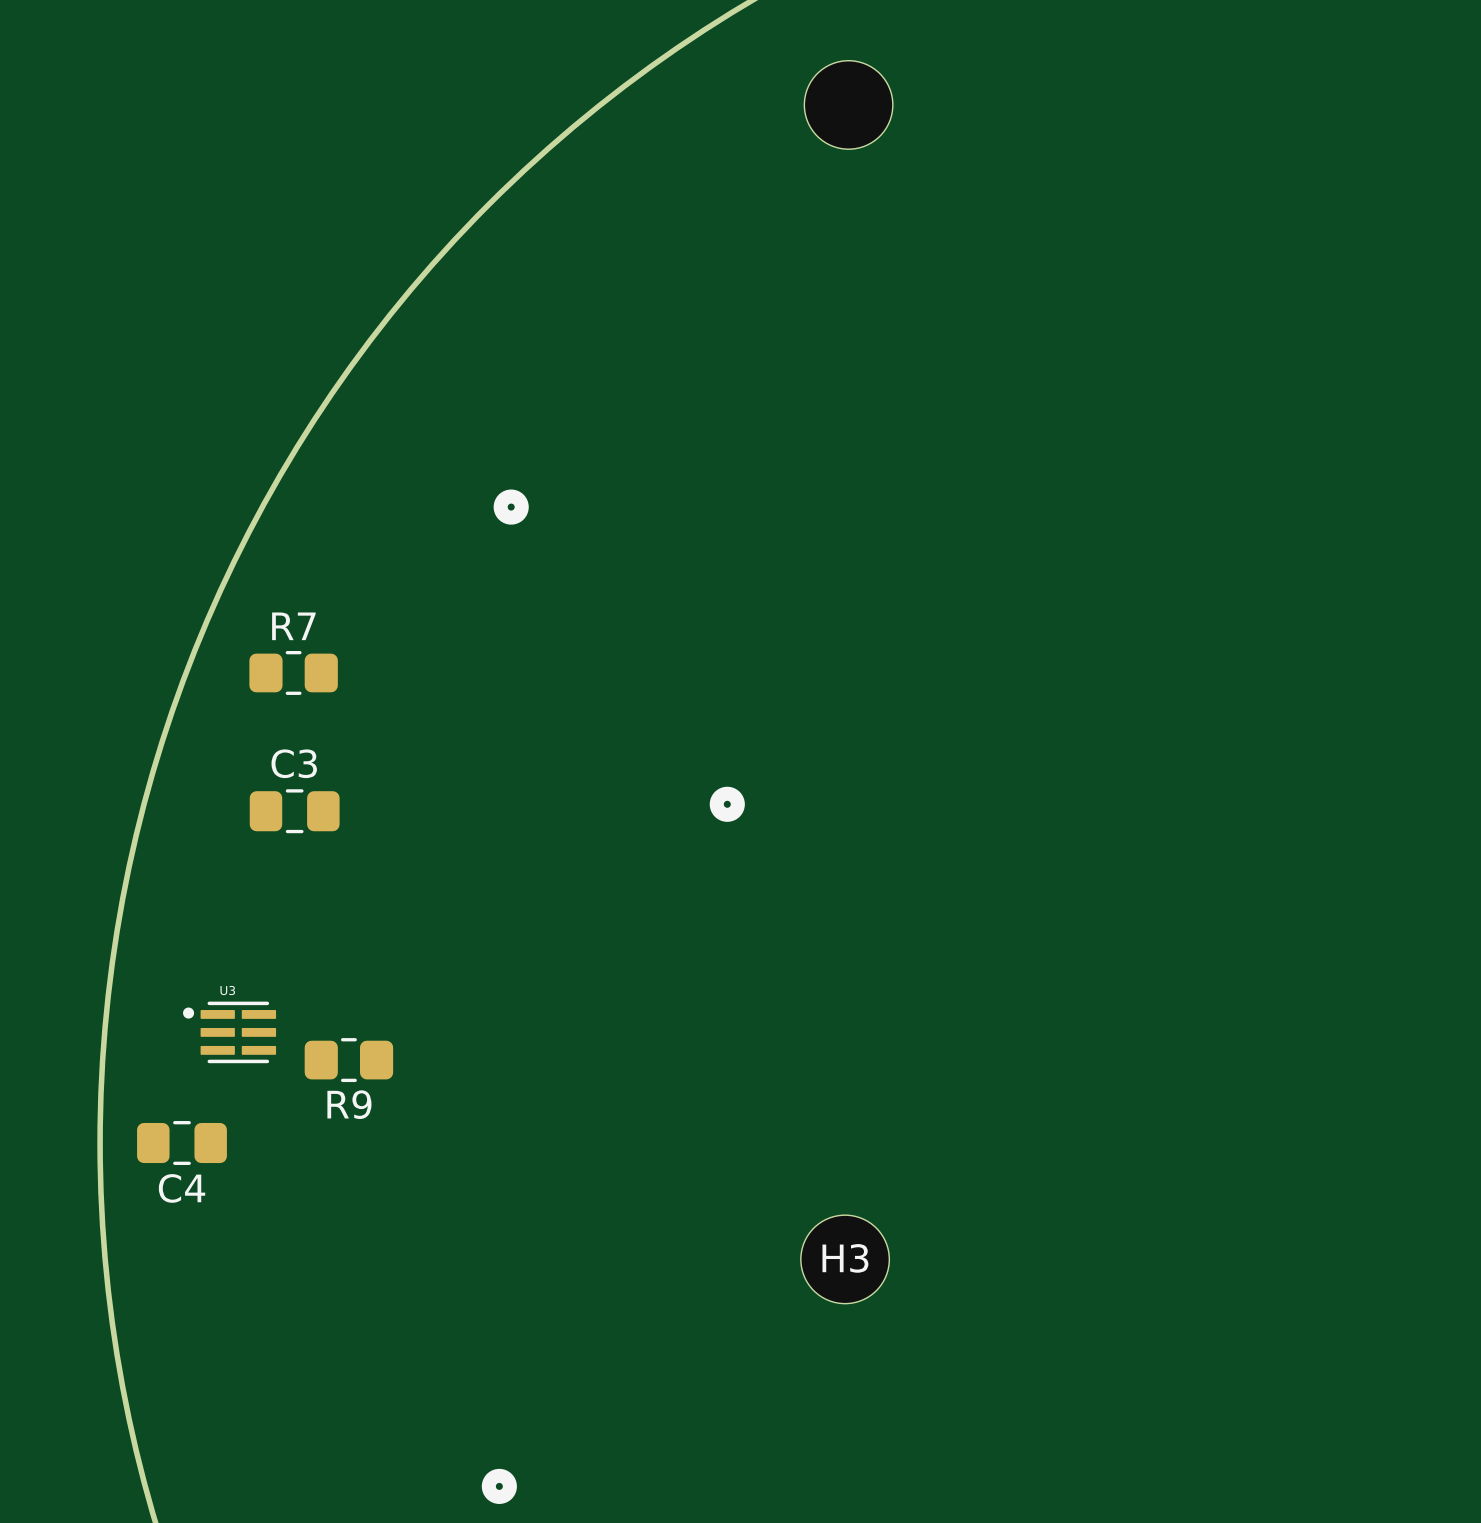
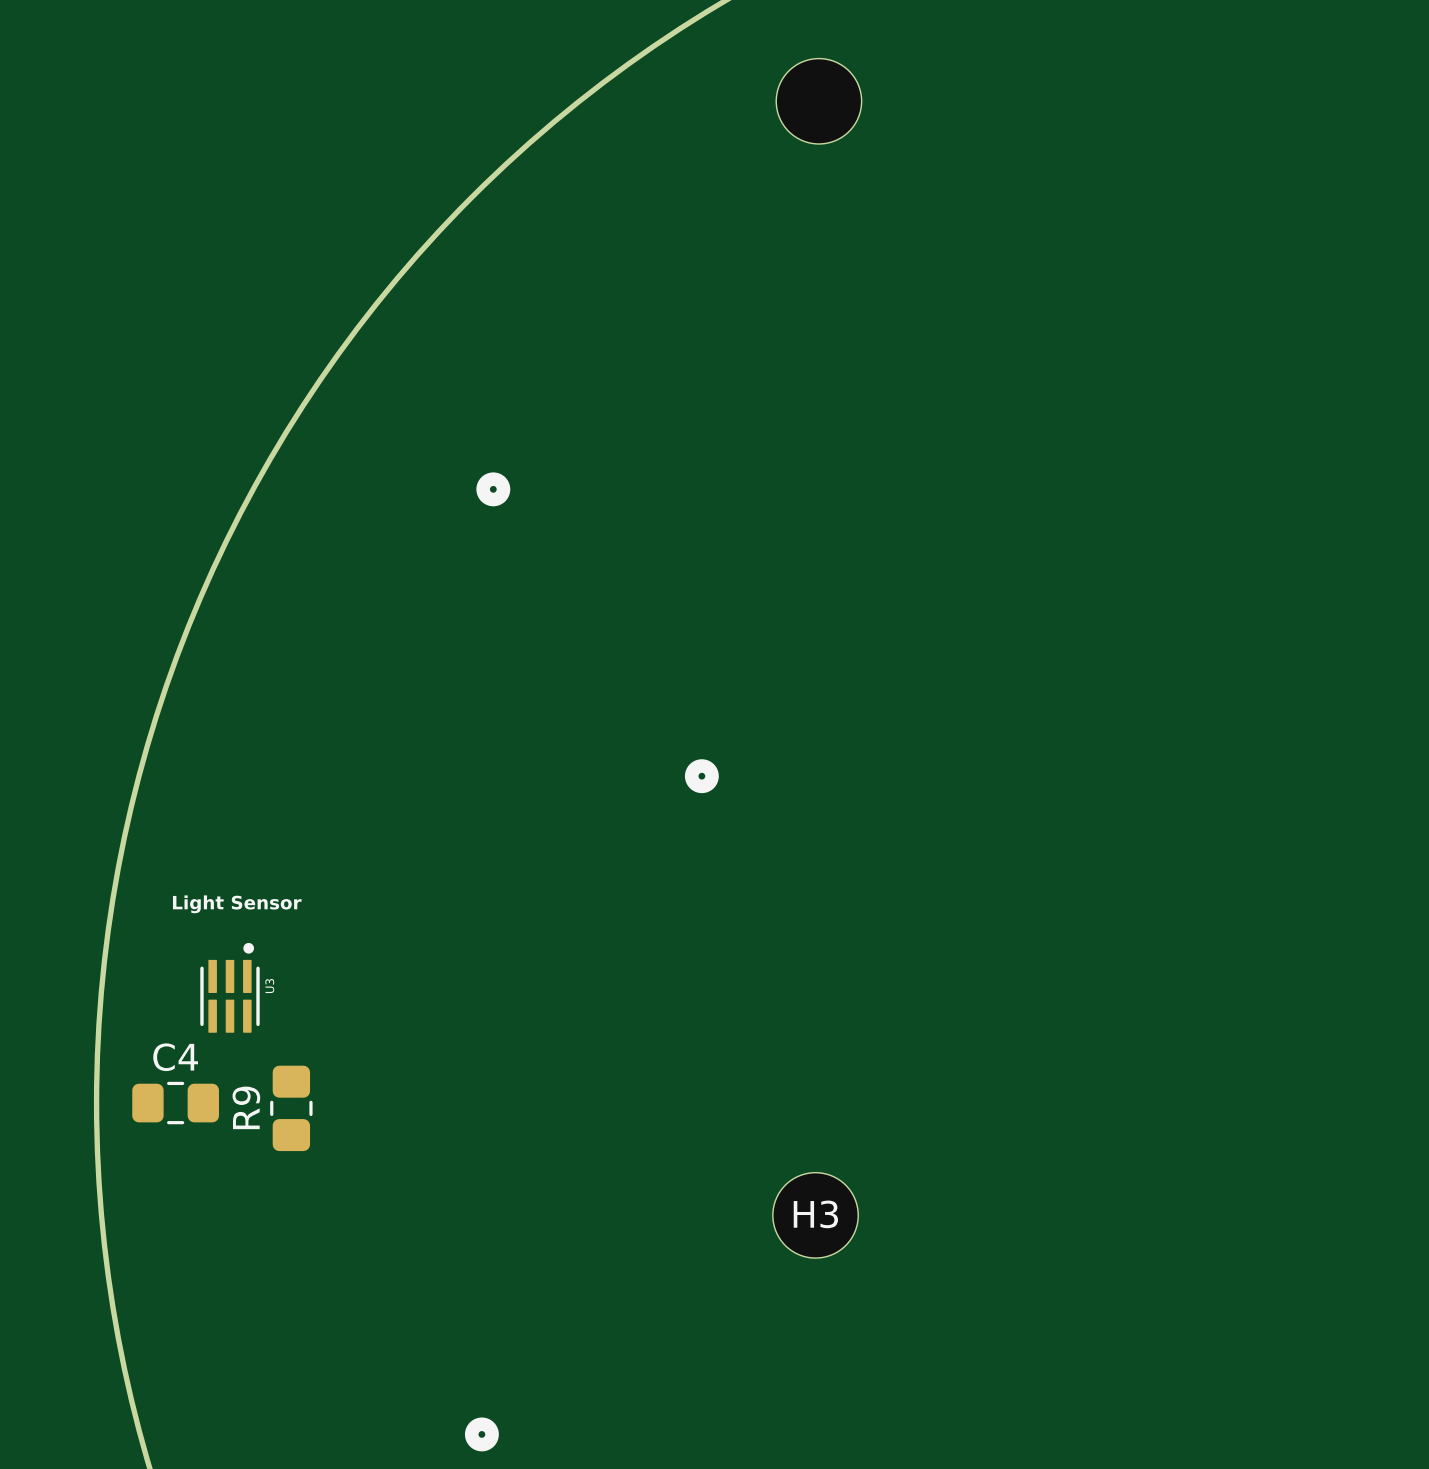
R7: (293, 672) -> none
C3: (294, 811) -> none
text: none -> Light Sensor (237, 904)
U3 rotation: 0° (229, 1032) -> 90° clockwise (229, 987)
R9 rotation: 0° (348, 1060) -> 90° clockwise (291, 1108)
R9 position: (348, 1060) -> (291, 1108)
C4 name position: C4 (181, 1188) -> C4 (175, 1057)

